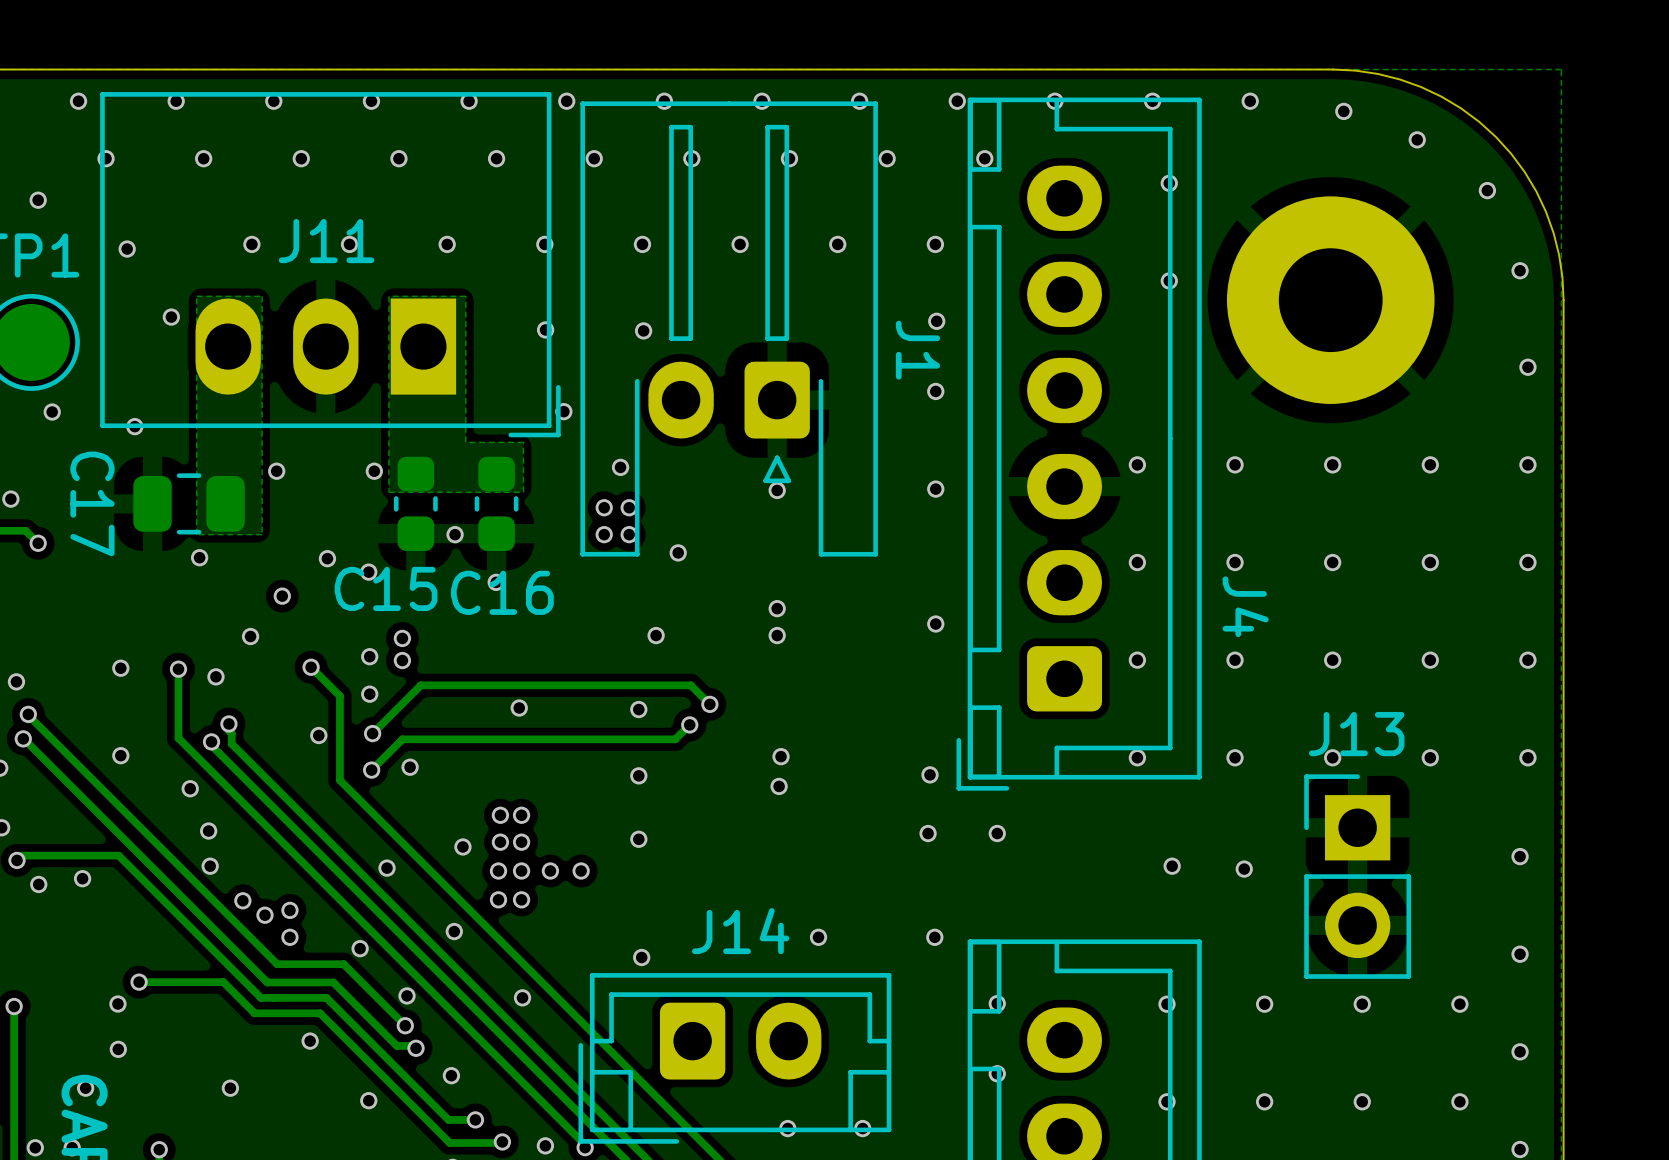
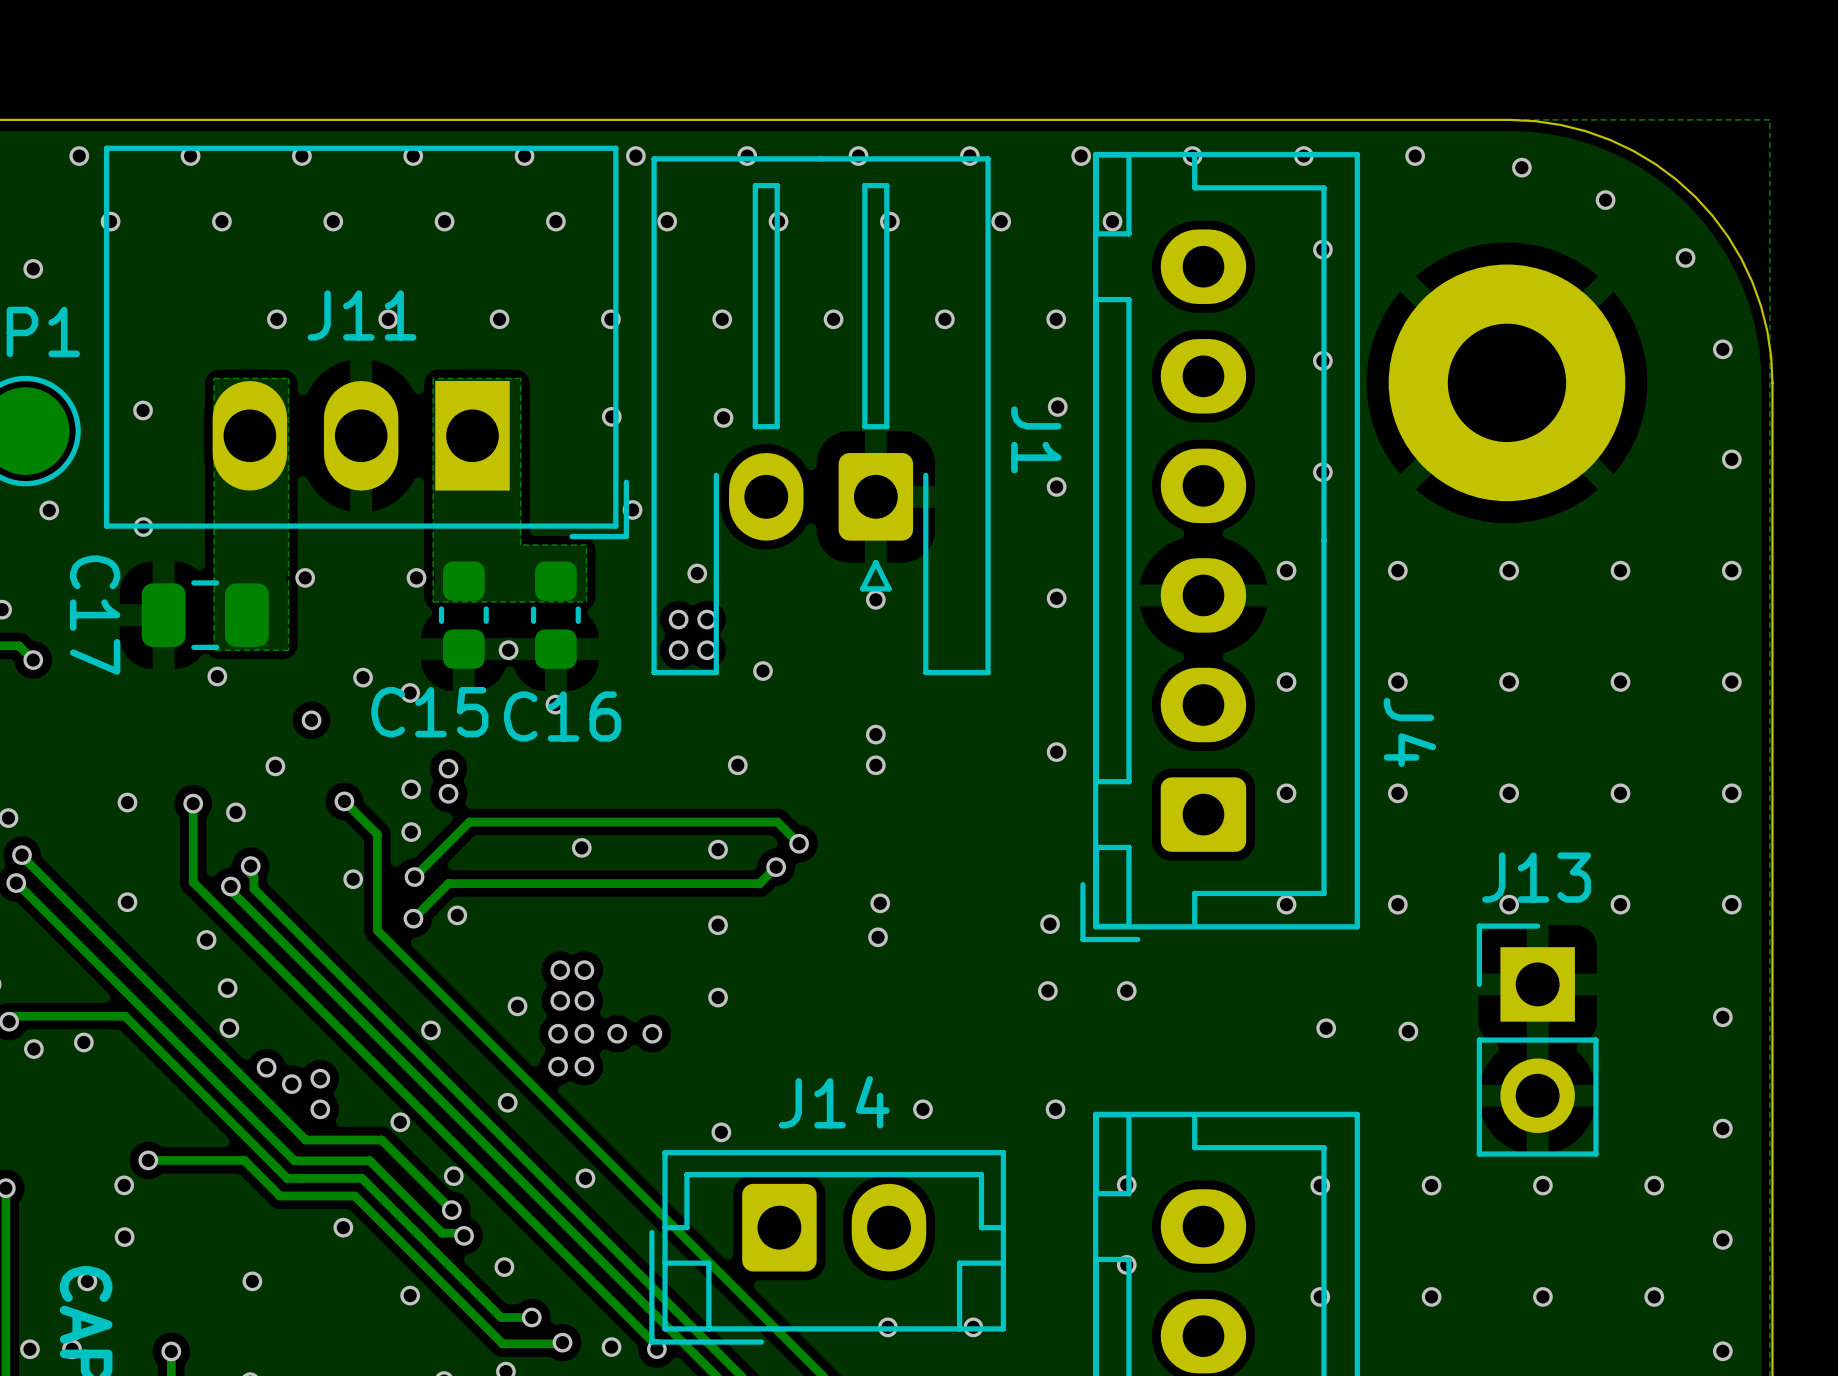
via: (127, 249) -> none
via: (171, 317) -> none
via: none -> (143, 410)
via: none -> (1322, 472)

